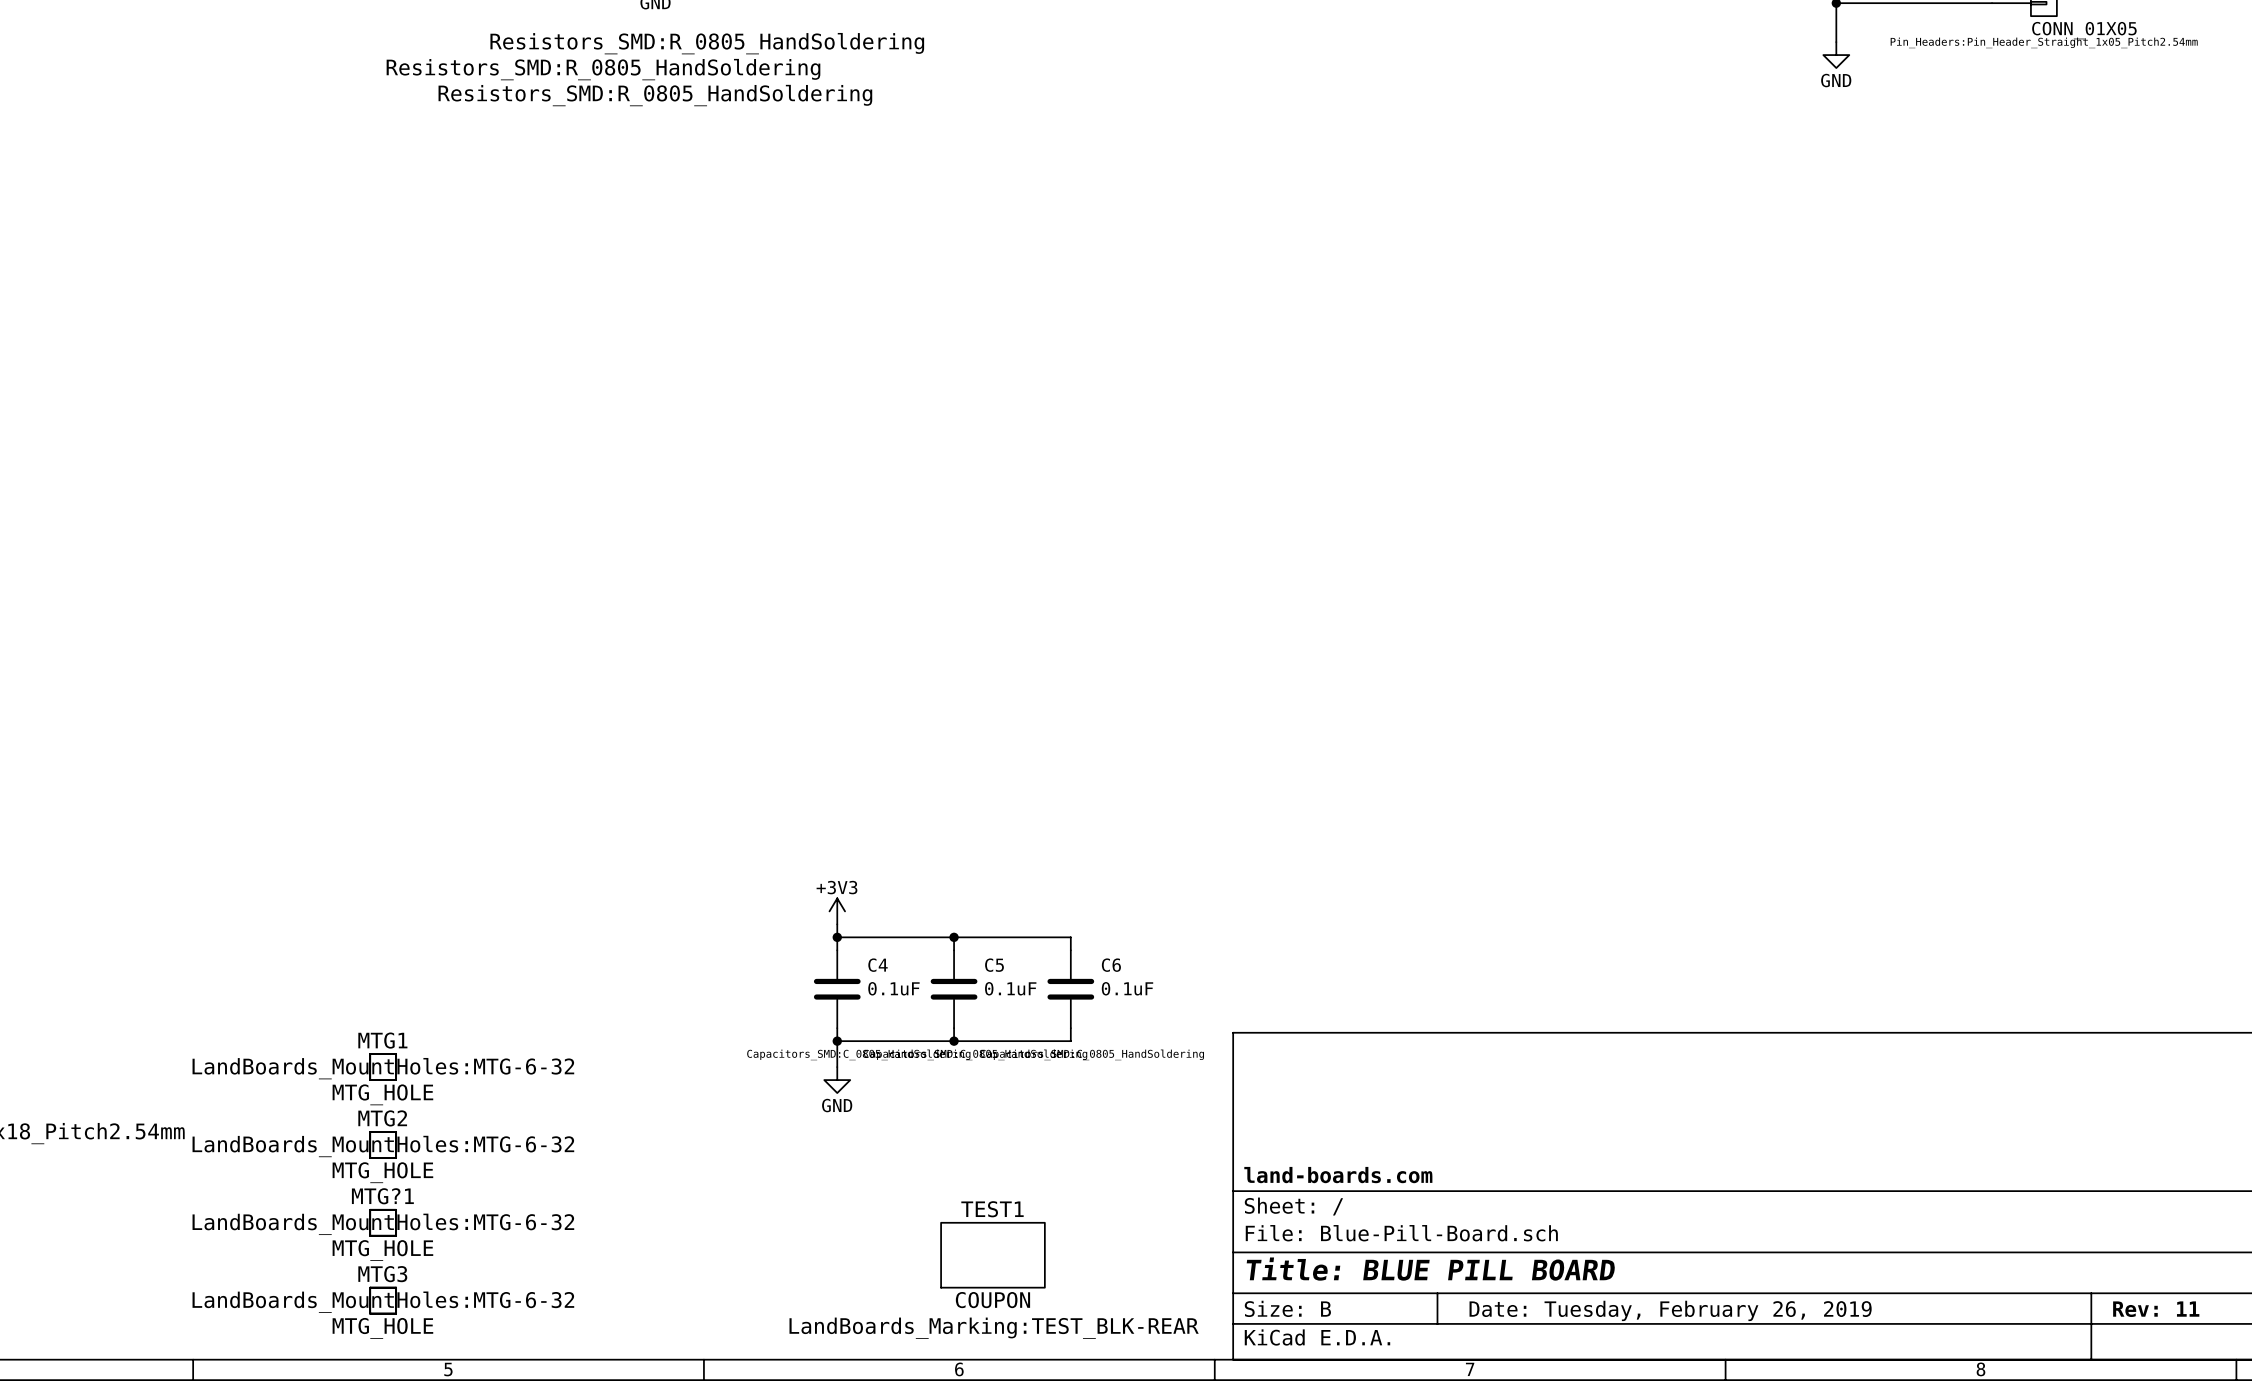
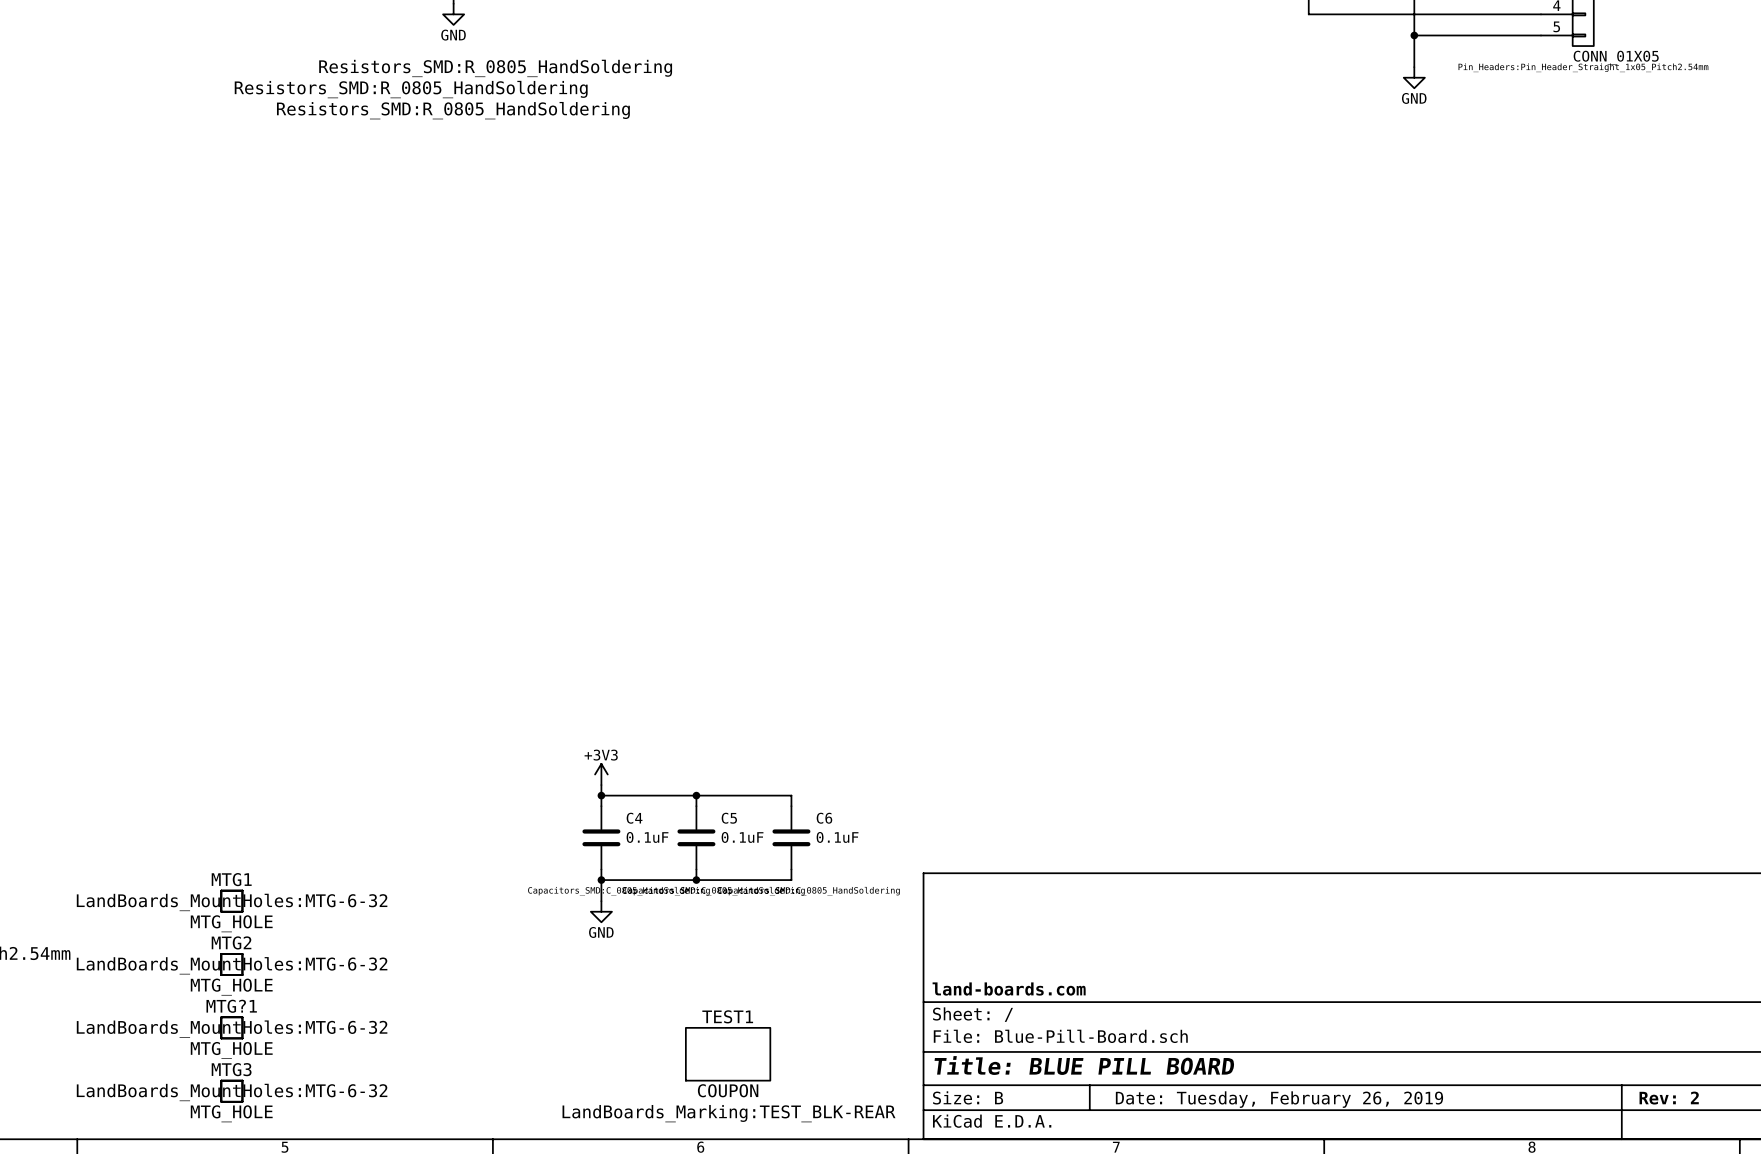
title block: Rev: 11 (2156, 1309) -> Rev: 2 (1669, 1098)

